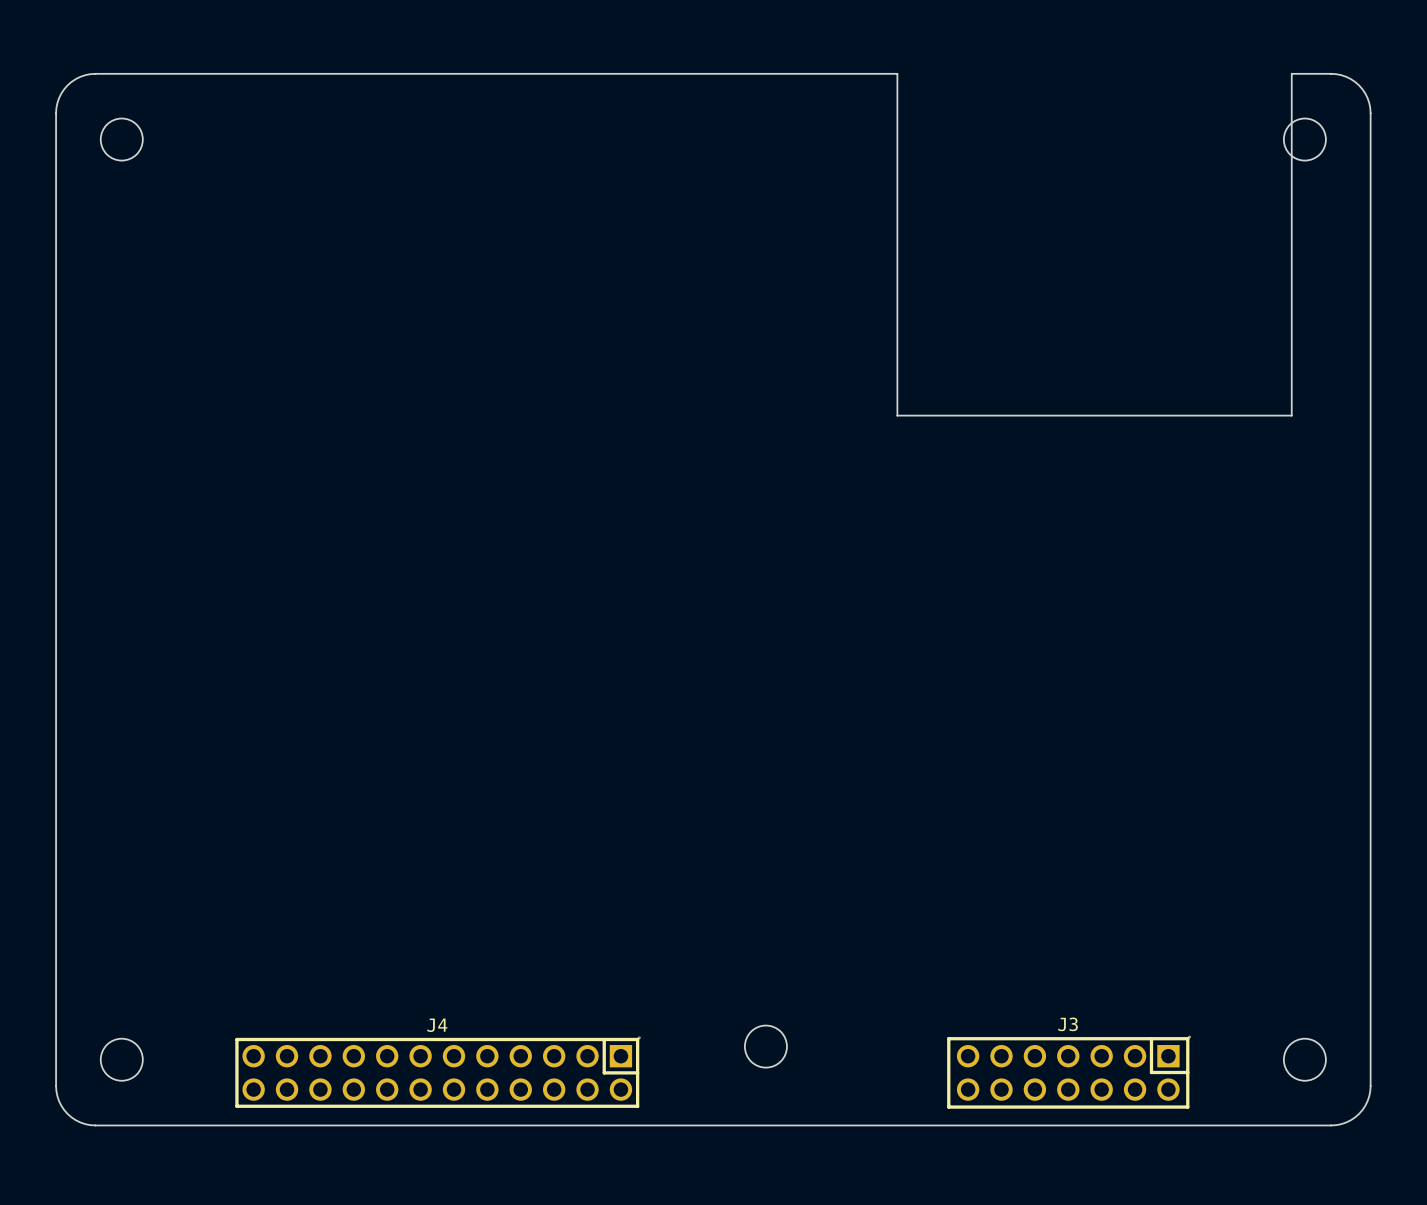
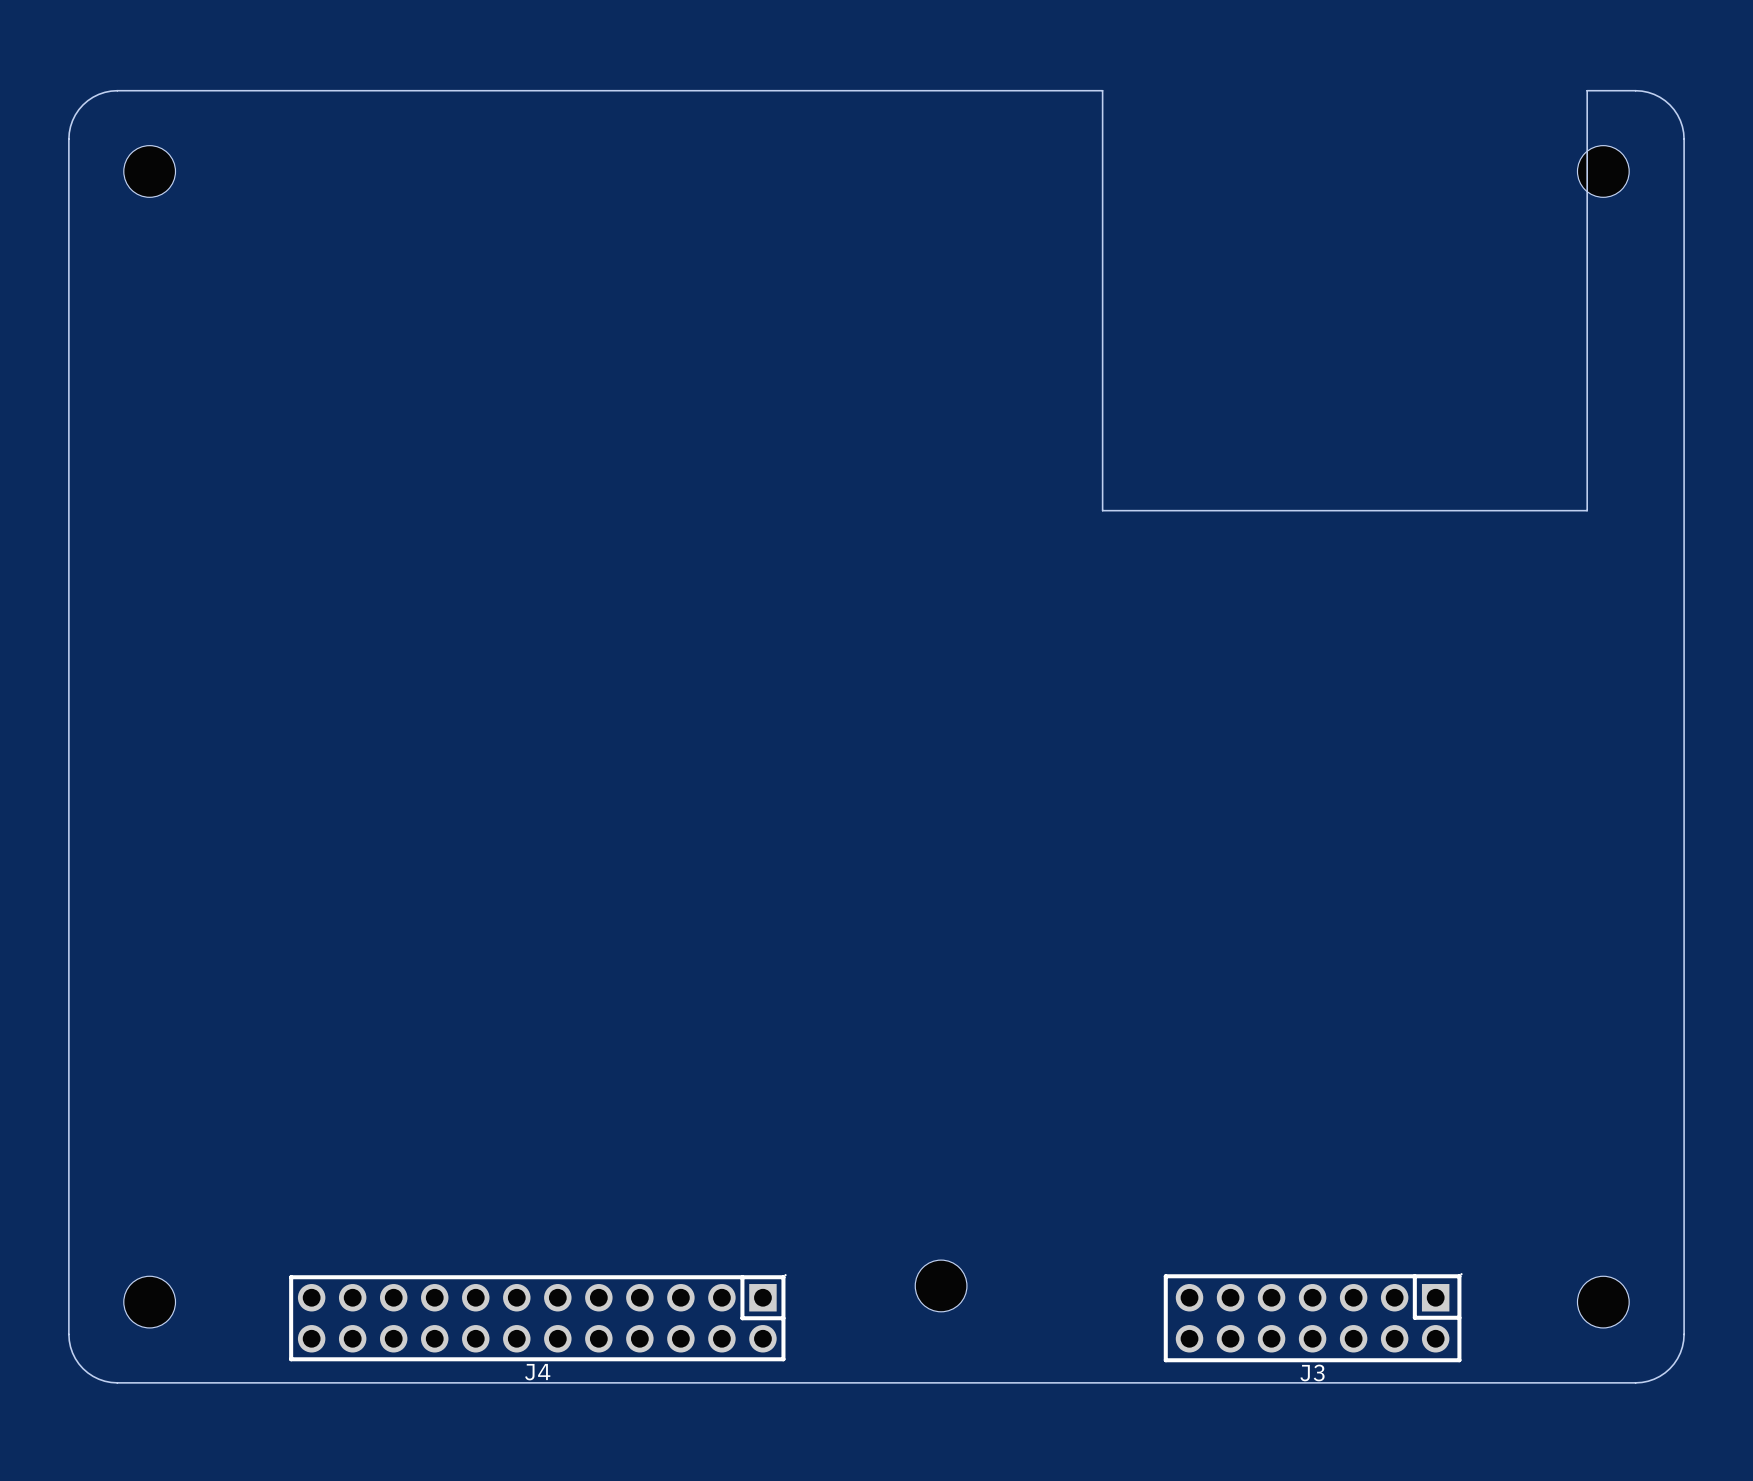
J3 name position: J3 (1068, 1024) -> J3 (1312, 1372)
J4 name position: J4 (437, 1025) -> J4 (537, 1372)

